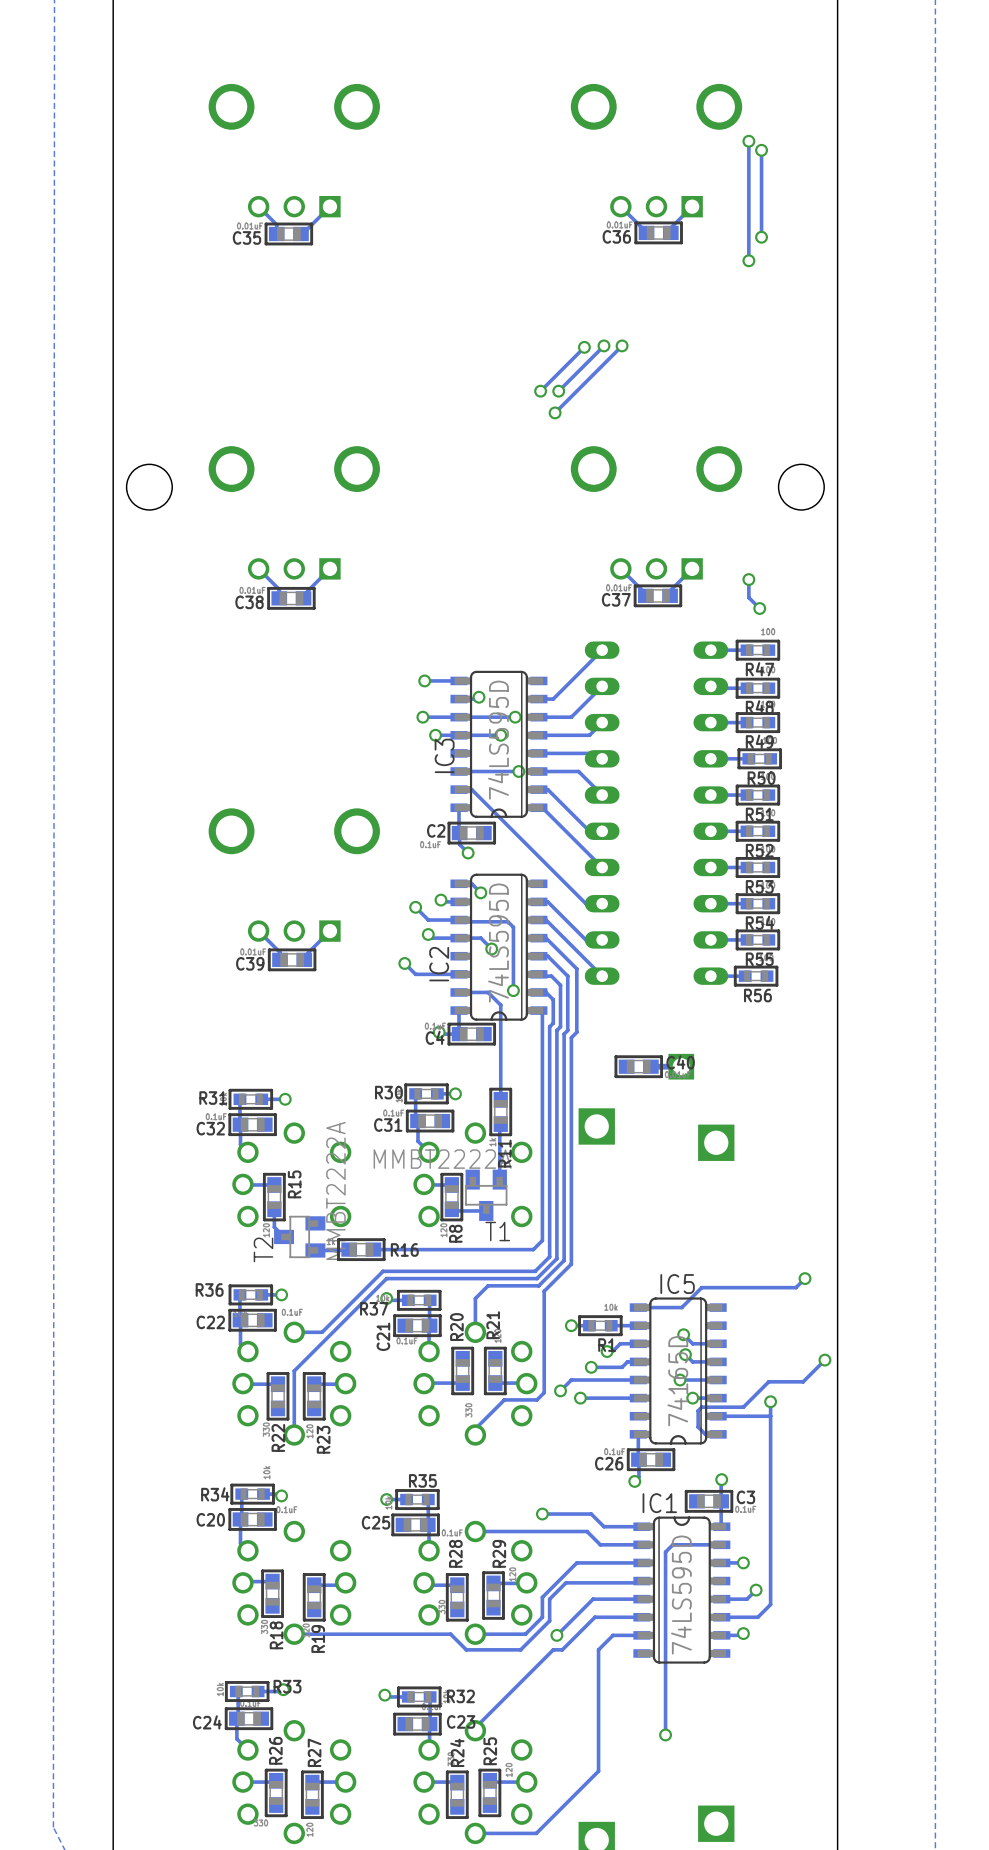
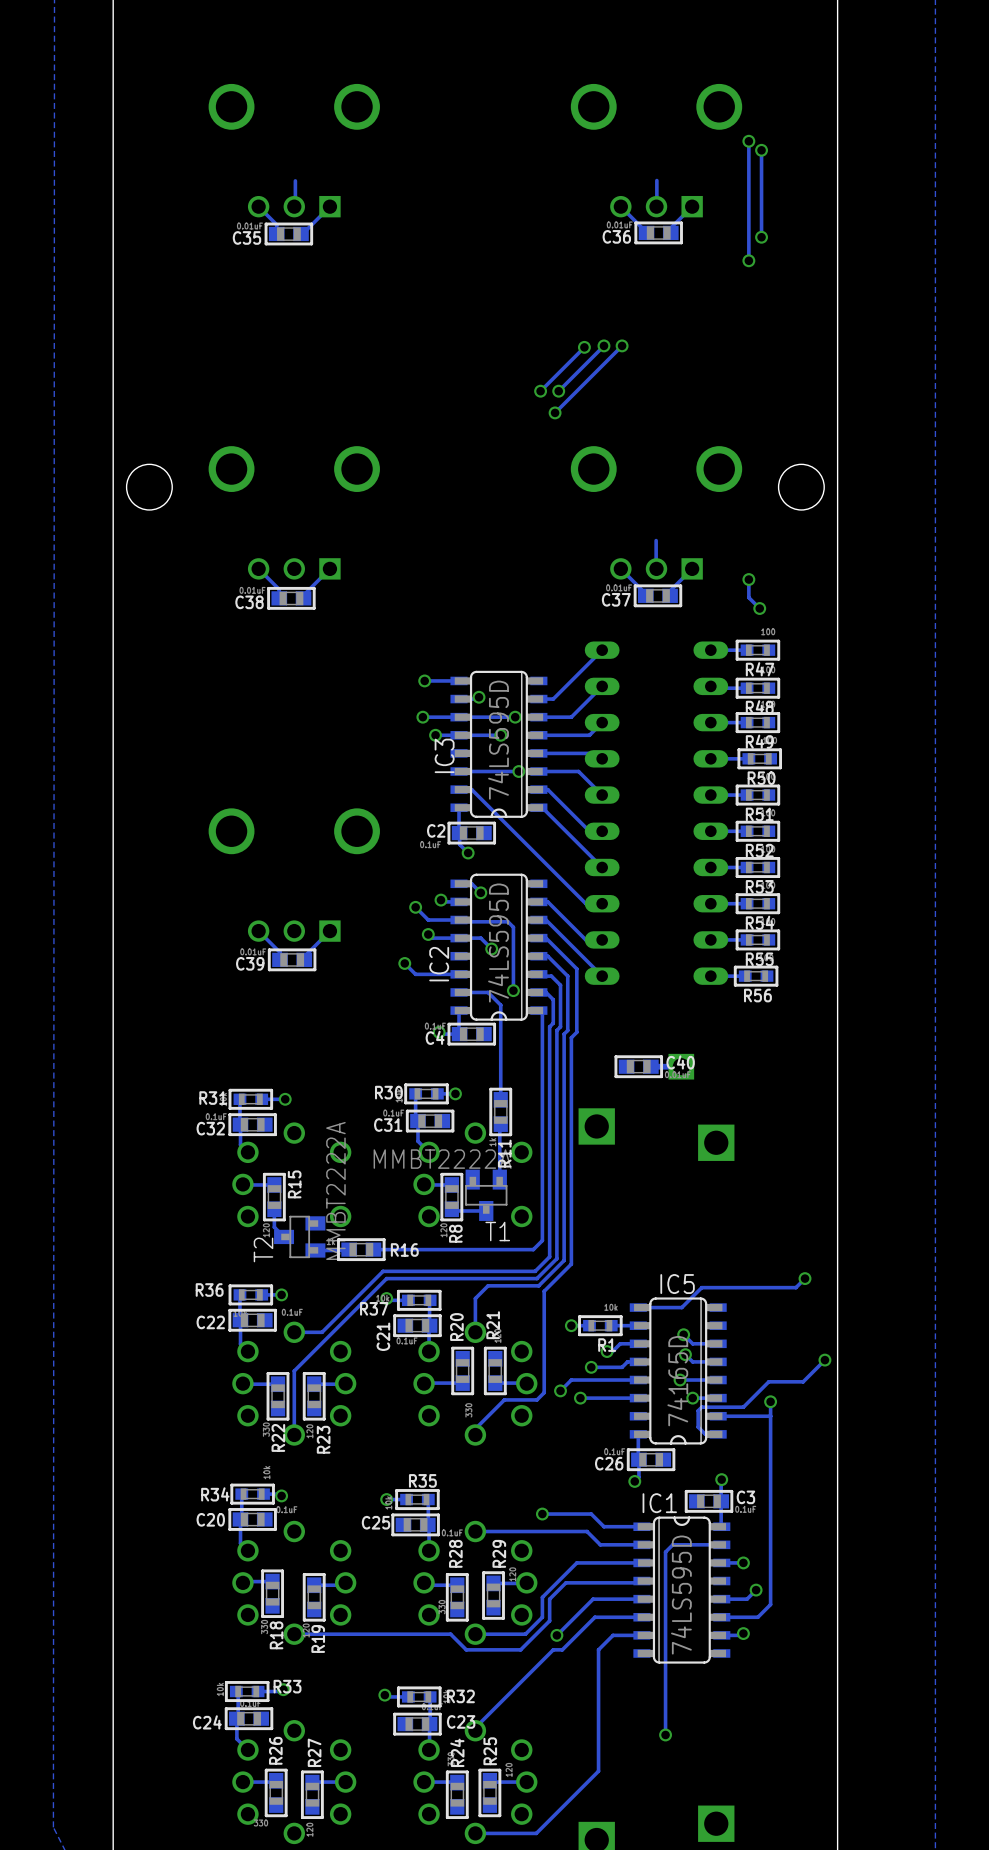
track: none -> (295, 180) (294, 206)
track: none -> (656, 180) (656, 206)
track: none -> (656, 540) (656, 568)

